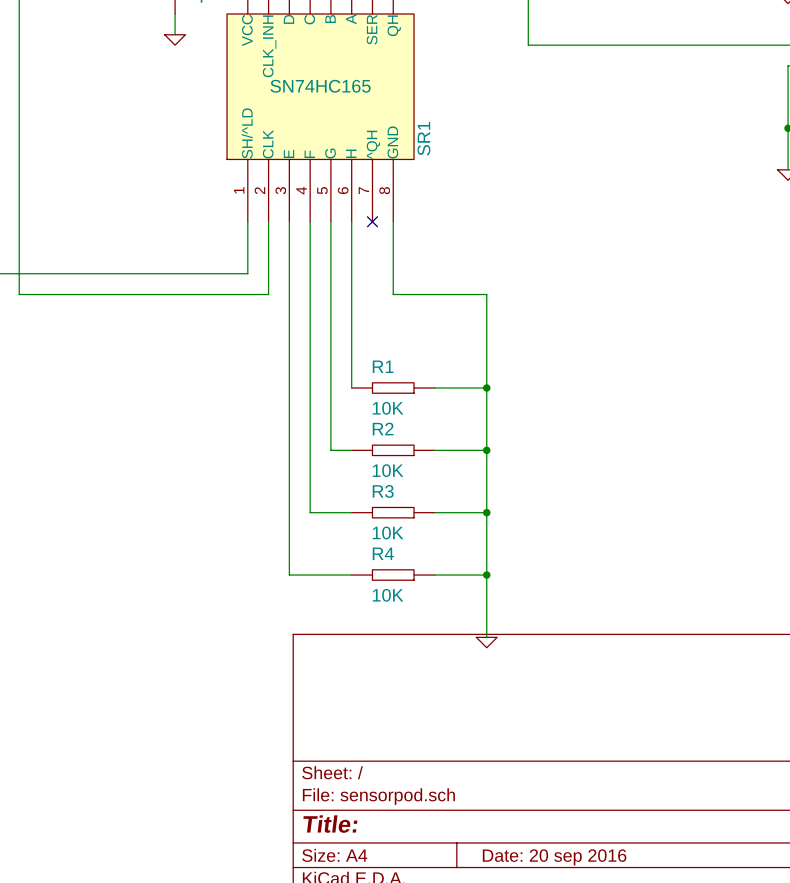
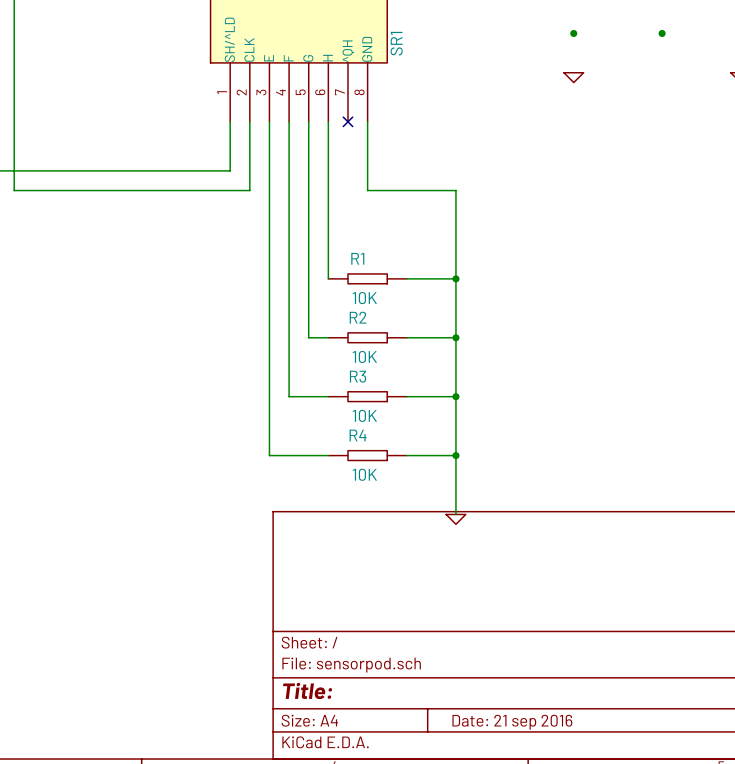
junction: none -> (573, 33)
junction: none -> (662, 33)
power symbol: none -> (573, 77)
title block: Date: 20 sep 2016 (554, 857) -> Date: 21 sep 2016 (512, 722)

